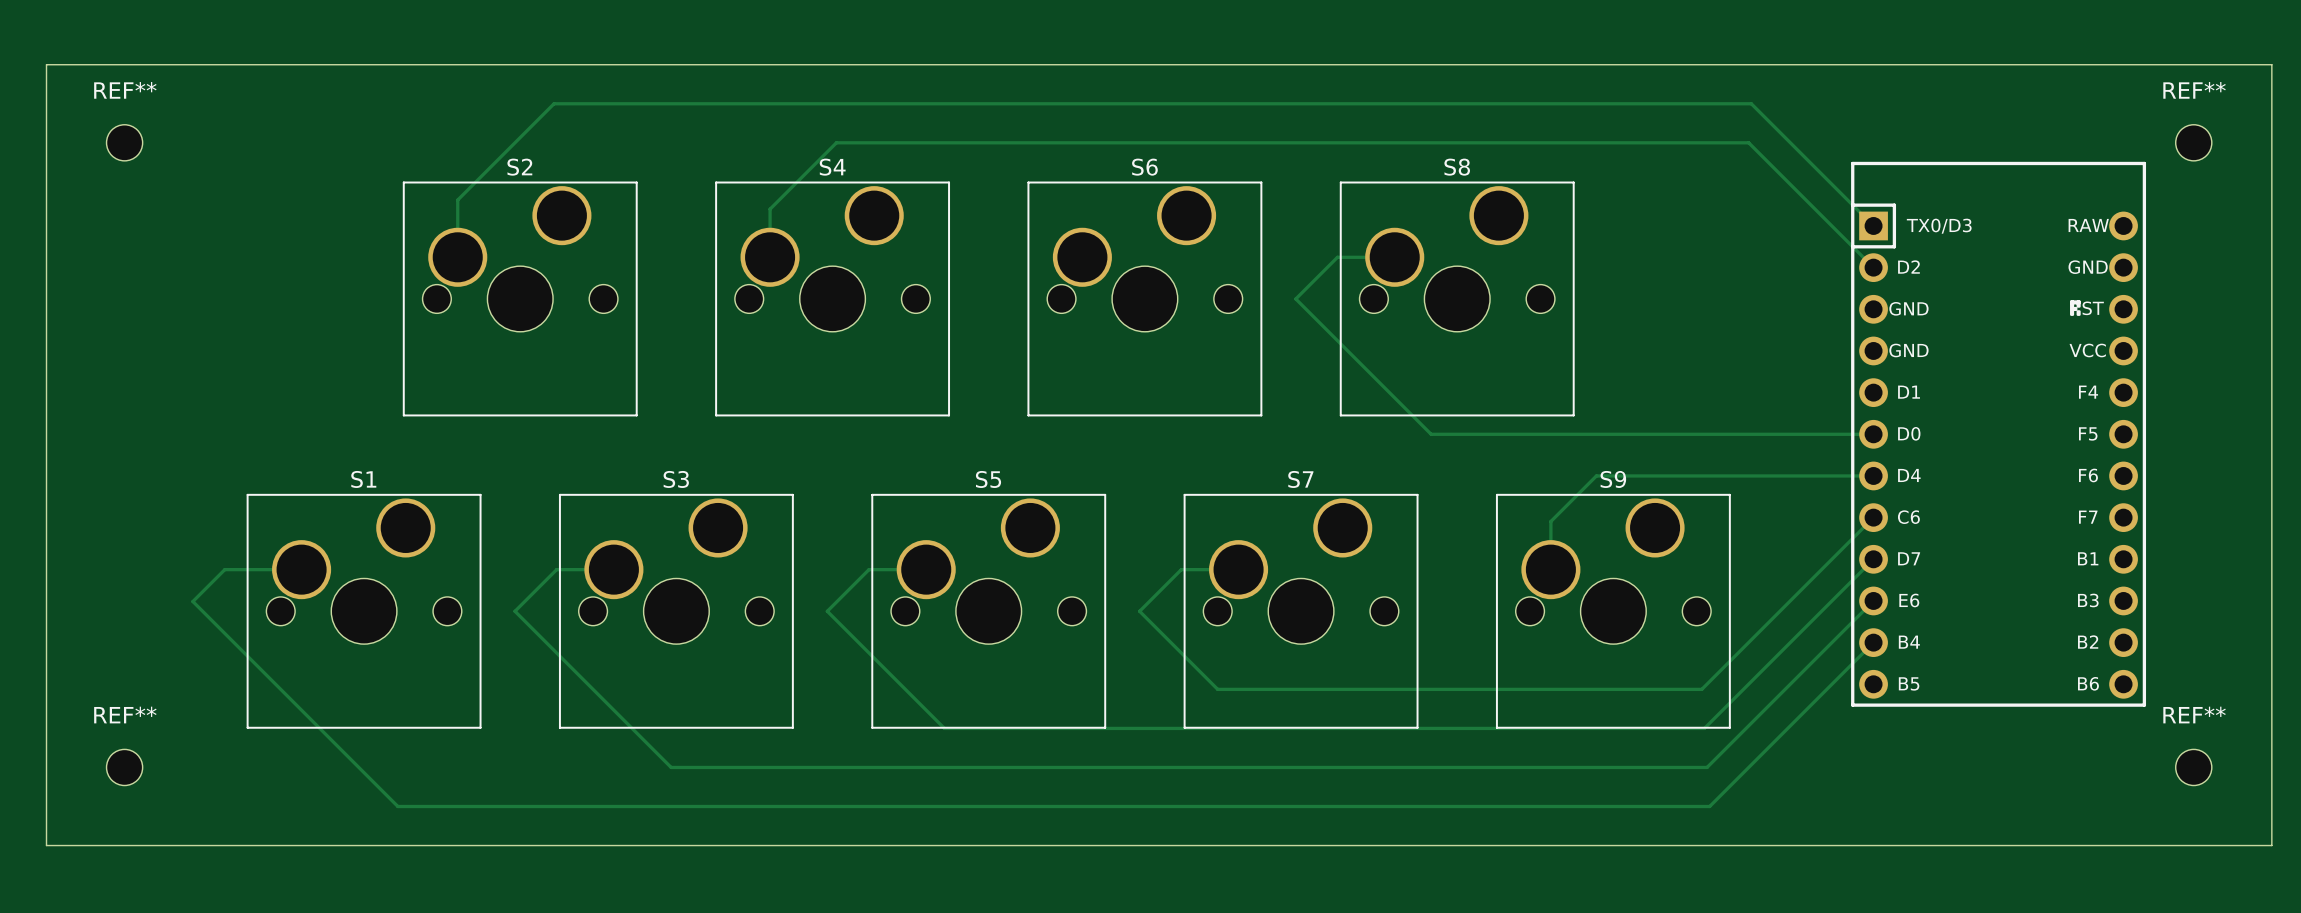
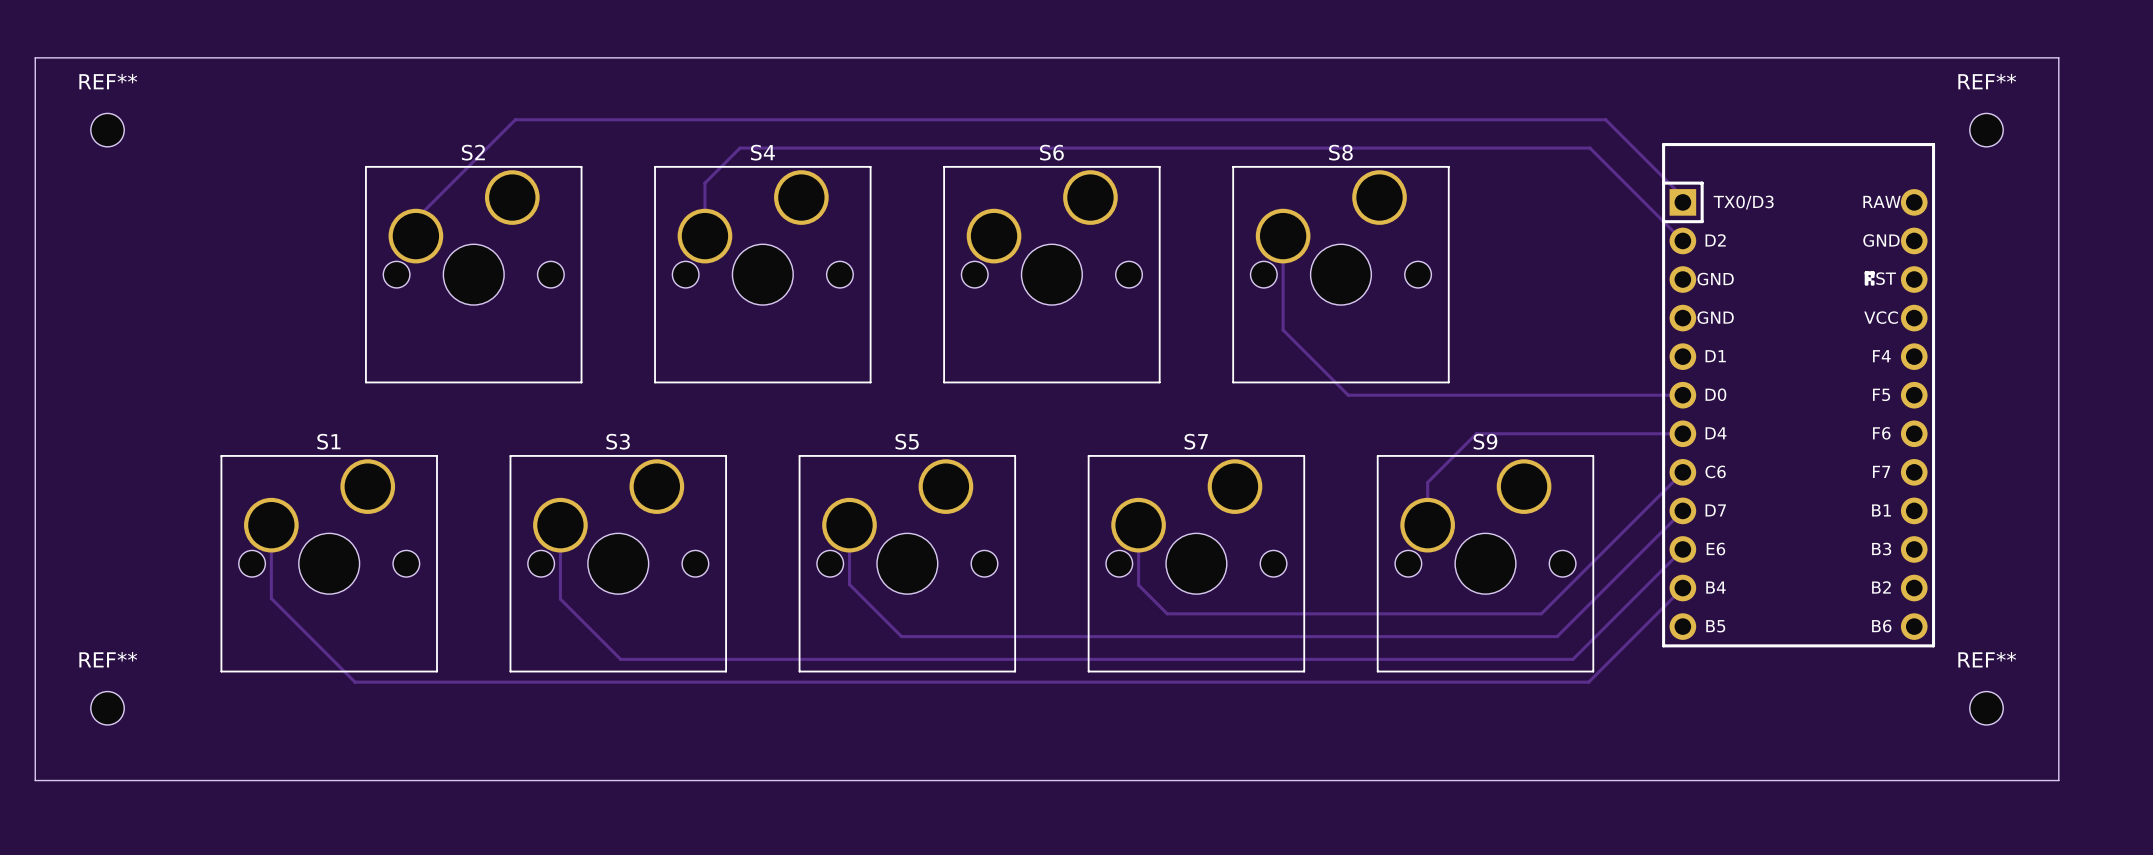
board edge: (2232, 64) (2271, 64) (2271, 845) (2232, 845) -> (2058, 57) (2058, 780)
REF** position: (2193, 142) -> (1986, 130)
track: (770, 209) (836, 142) (1748, 142) (1873, 267) -> (704, 191) (704, 183) (739, 148) (1590, 148) (1682, 240)
track: (1873, 225) (1751, 103) (554, 103) (457, 200) (457, 239) -> (1682, 202) (1682, 196) (1605, 119) (515, 119) (415, 219)
track: (1394, 257) (1337, 257) (1295, 298) (1431, 434) (1873, 434) -> (1283, 236) (1283, 330) (1348, 395) (1682, 395)
part position: (1998, 434) -> (1798, 395)
track: (1873, 475) (1596, 475) (1550, 523) -> (1682, 433) (1476, 433) (1427, 482)
track: (1873, 517) (1701, 689) (1217, 689) (1139, 611) (1181, 569) (1238, 569) -> (1682, 472) (1541, 613) (1167, 613) (1138, 585) (1138, 525)
track: (1873, 559) (1704, 728) (944, 728) (827, 611) (868, 569) (926, 569) -> (1682, 510) (1557, 636) (901, 636) (849, 584) (849, 525)
track: (301, 569) (224, 569) (192, 601) (397, 806) (1709, 806) (1873, 642) -> (271, 525) (271, 598) (355, 682) (1588, 682) (1682, 588)
track: (613, 569) (556, 569) (514, 611) (671, 767) (1707, 767) (1873, 600) -> (560, 525) (560, 599) (620, 659) (1572, 659) (1682, 549)
REF** position: (2193, 767) -> (1986, 708)

